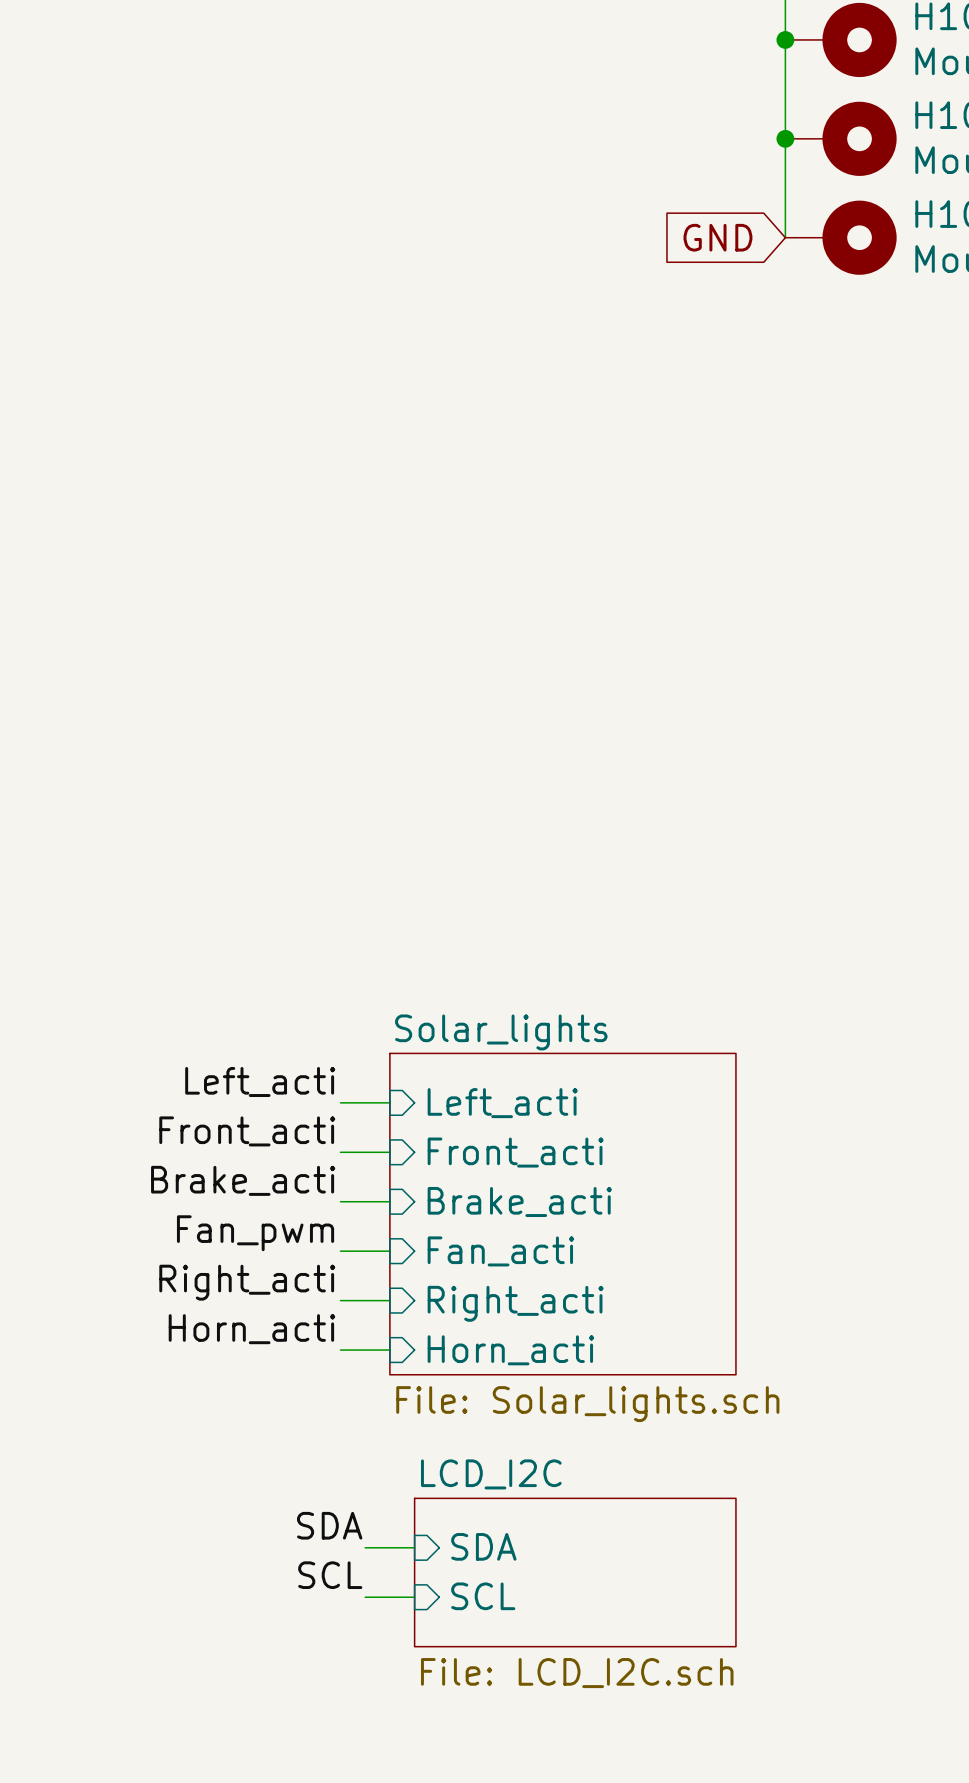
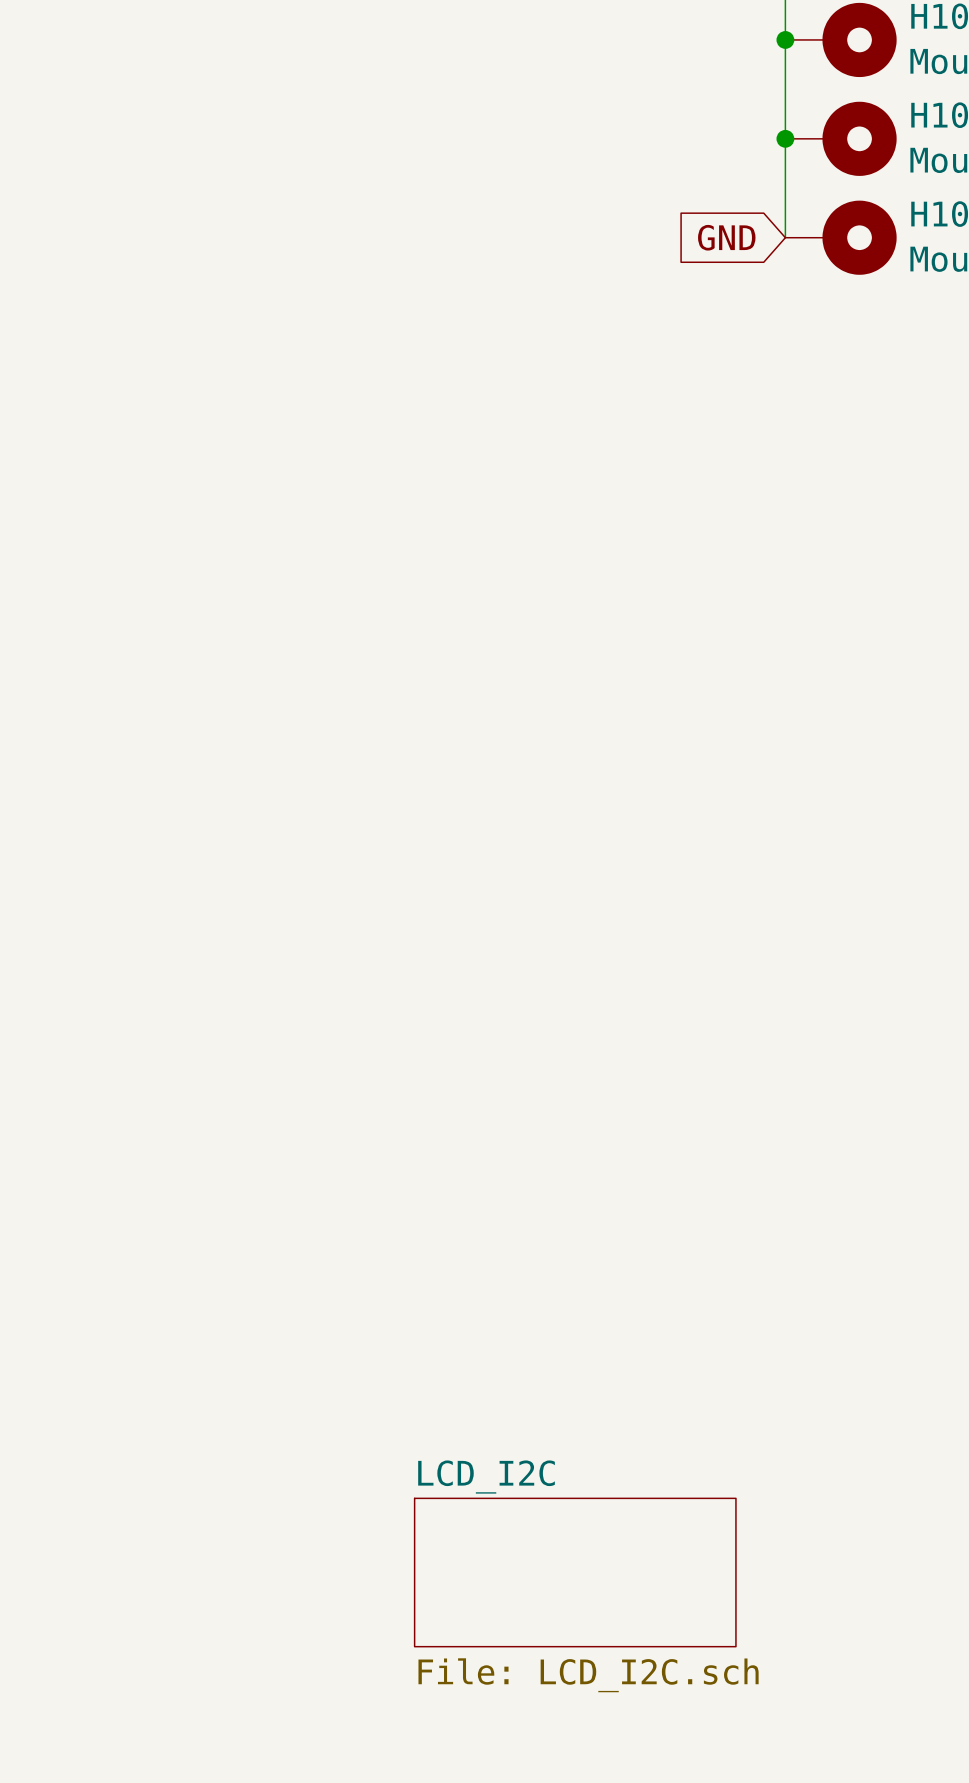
label: Left_acti (260, 1081) -> none
wire: (340, 1102) (389, 1102) -> none
sheet pin: Left_acti (502, 1103) -> none
label: Front_acti (247, 1131) -> none
wire: (340, 1152) (389, 1152) -> none
sheet pin: Front_acti (515, 1152) -> none
label: Brake_acti (243, 1180) -> none
wire: (340, 1201) (389, 1201) -> none
sheet pin: Brake_acti (519, 1201) -> none
sheet Solar_lights: File: Solar_lights.sch (562, 1214) -> none
label: Fan_pwm (255, 1233) -> none
wire: (340, 1251) (389, 1251) -> none
sheet pin: Fan_acti (500, 1251) -> none
label: Right_acti (247, 1282) -> none
wire: (340, 1300) (389, 1300) -> none
sheet pin: Right_acti (515, 1303) -> none
label: Horn_acti (251, 1329) -> none
wire: (340, 1350) (389, 1350) -> none
sheet pin: Horn_acti (510, 1350) -> none
label: SDA (329, 1525) -> none
sheet pin: SDA (483, 1546) -> none
wire: (365, 1547) (414, 1547) -> none
label: SCL (330, 1575) -> none
sheet pin: SCL (483, 1596) -> none
wire: (365, 1597) (414, 1597) -> none

